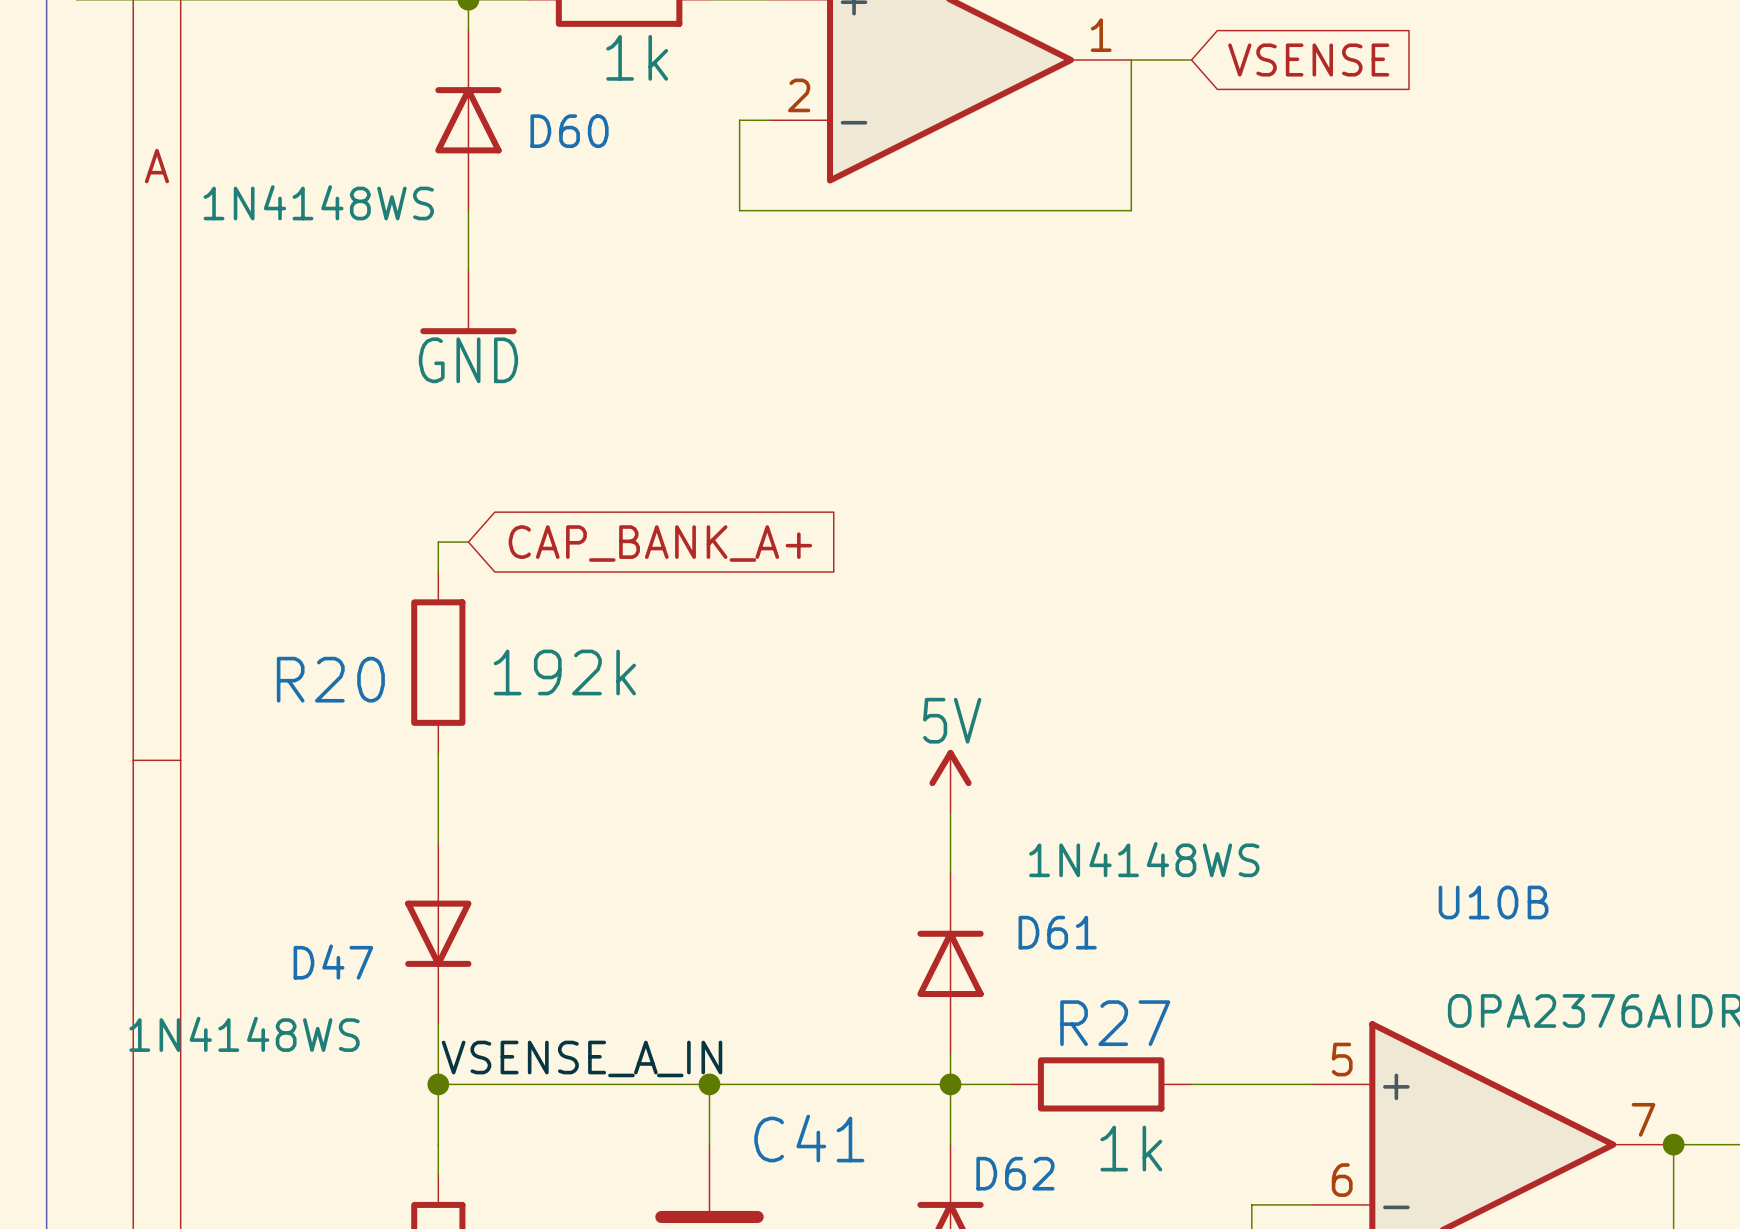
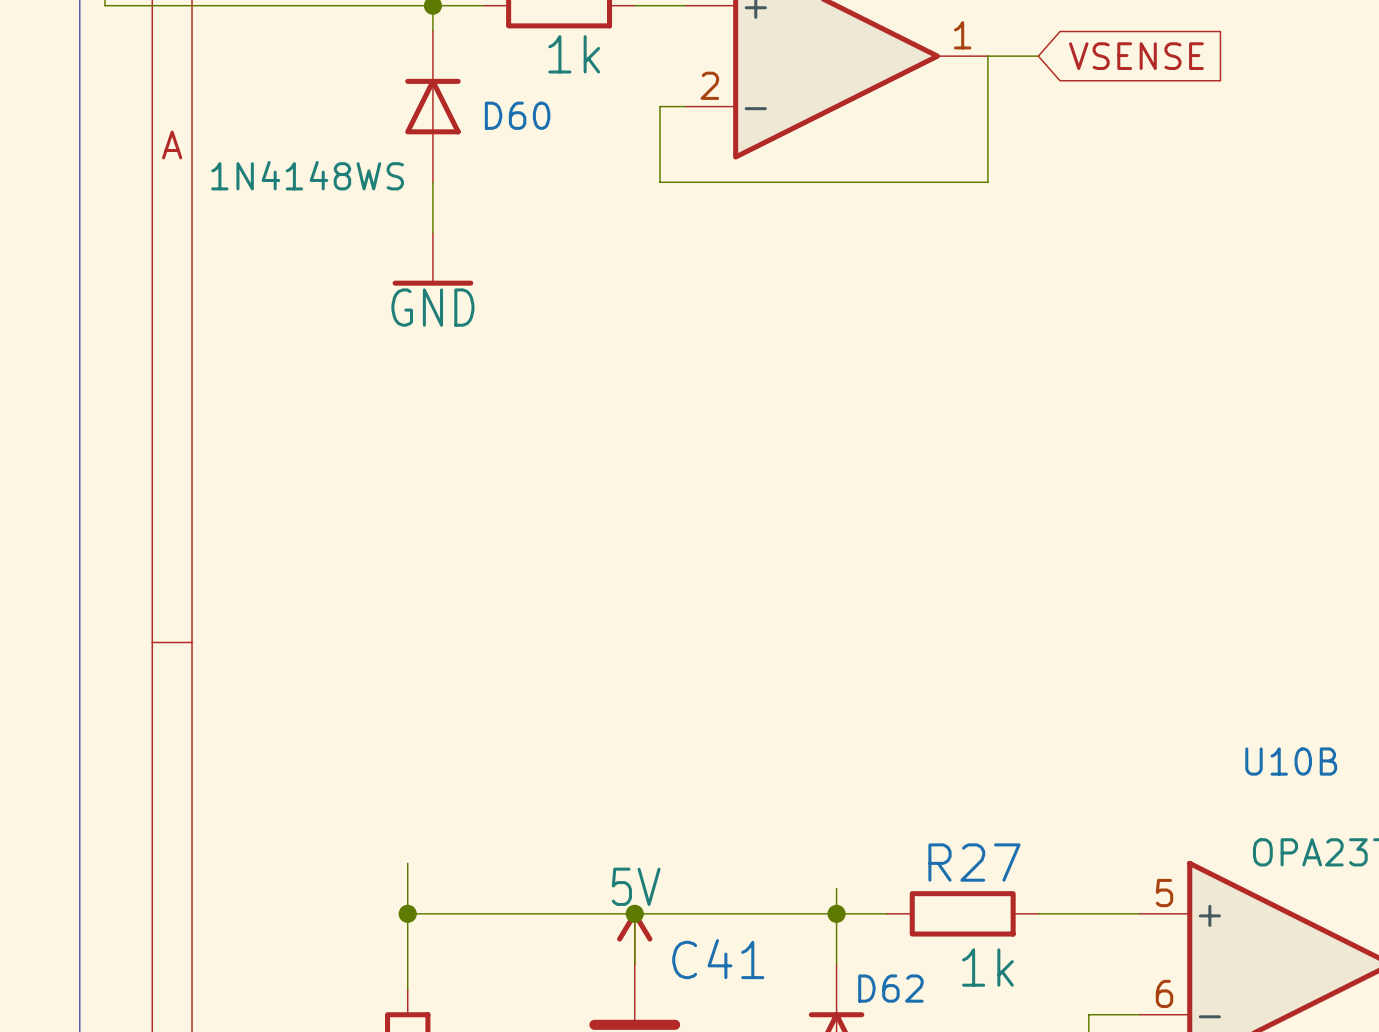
wire: (468, 542) (438, 542) (438, 572) -> none
global label: CAP_BANK_A+ (660, 543) -> none
R20: 192k (438, 662) -> none
wire: (438, 752) (438, 843) -> none
power symbol position: 5V (950, 781) -> 5V (634, 937)
wire: (950, 813) (950, 873) -> none
D47: 1N4148WS (438, 933) -> none
D61: 1N4148WS (950, 963) -> none
label: VSENSE_A_IN (582, 1058) -> none

